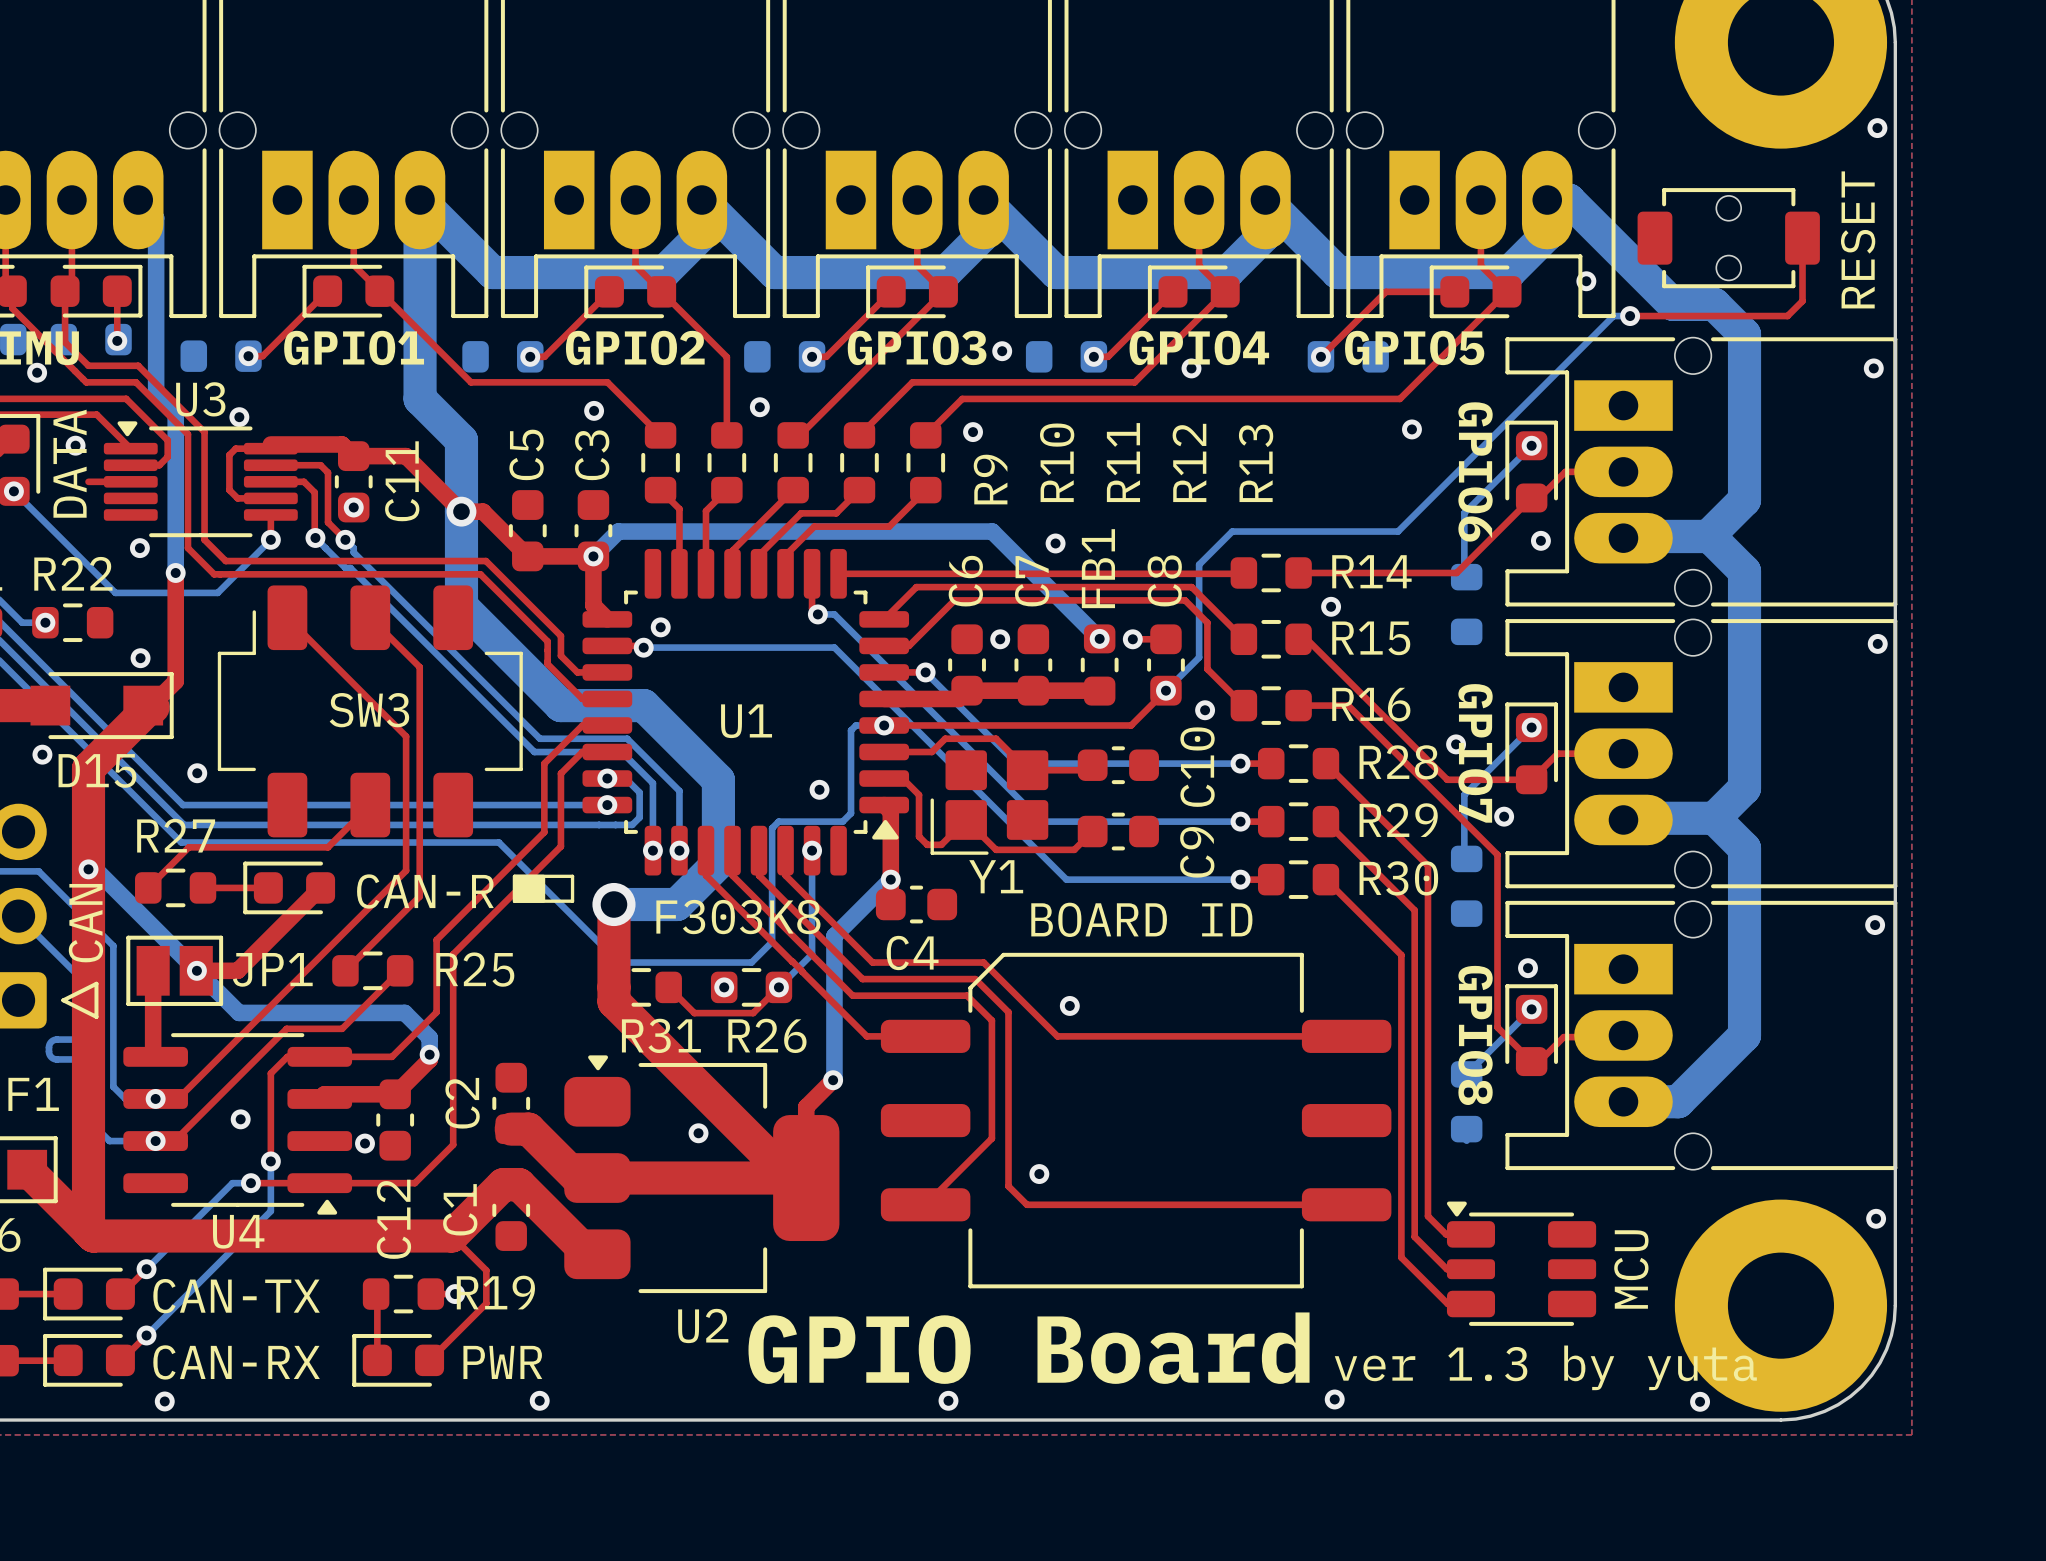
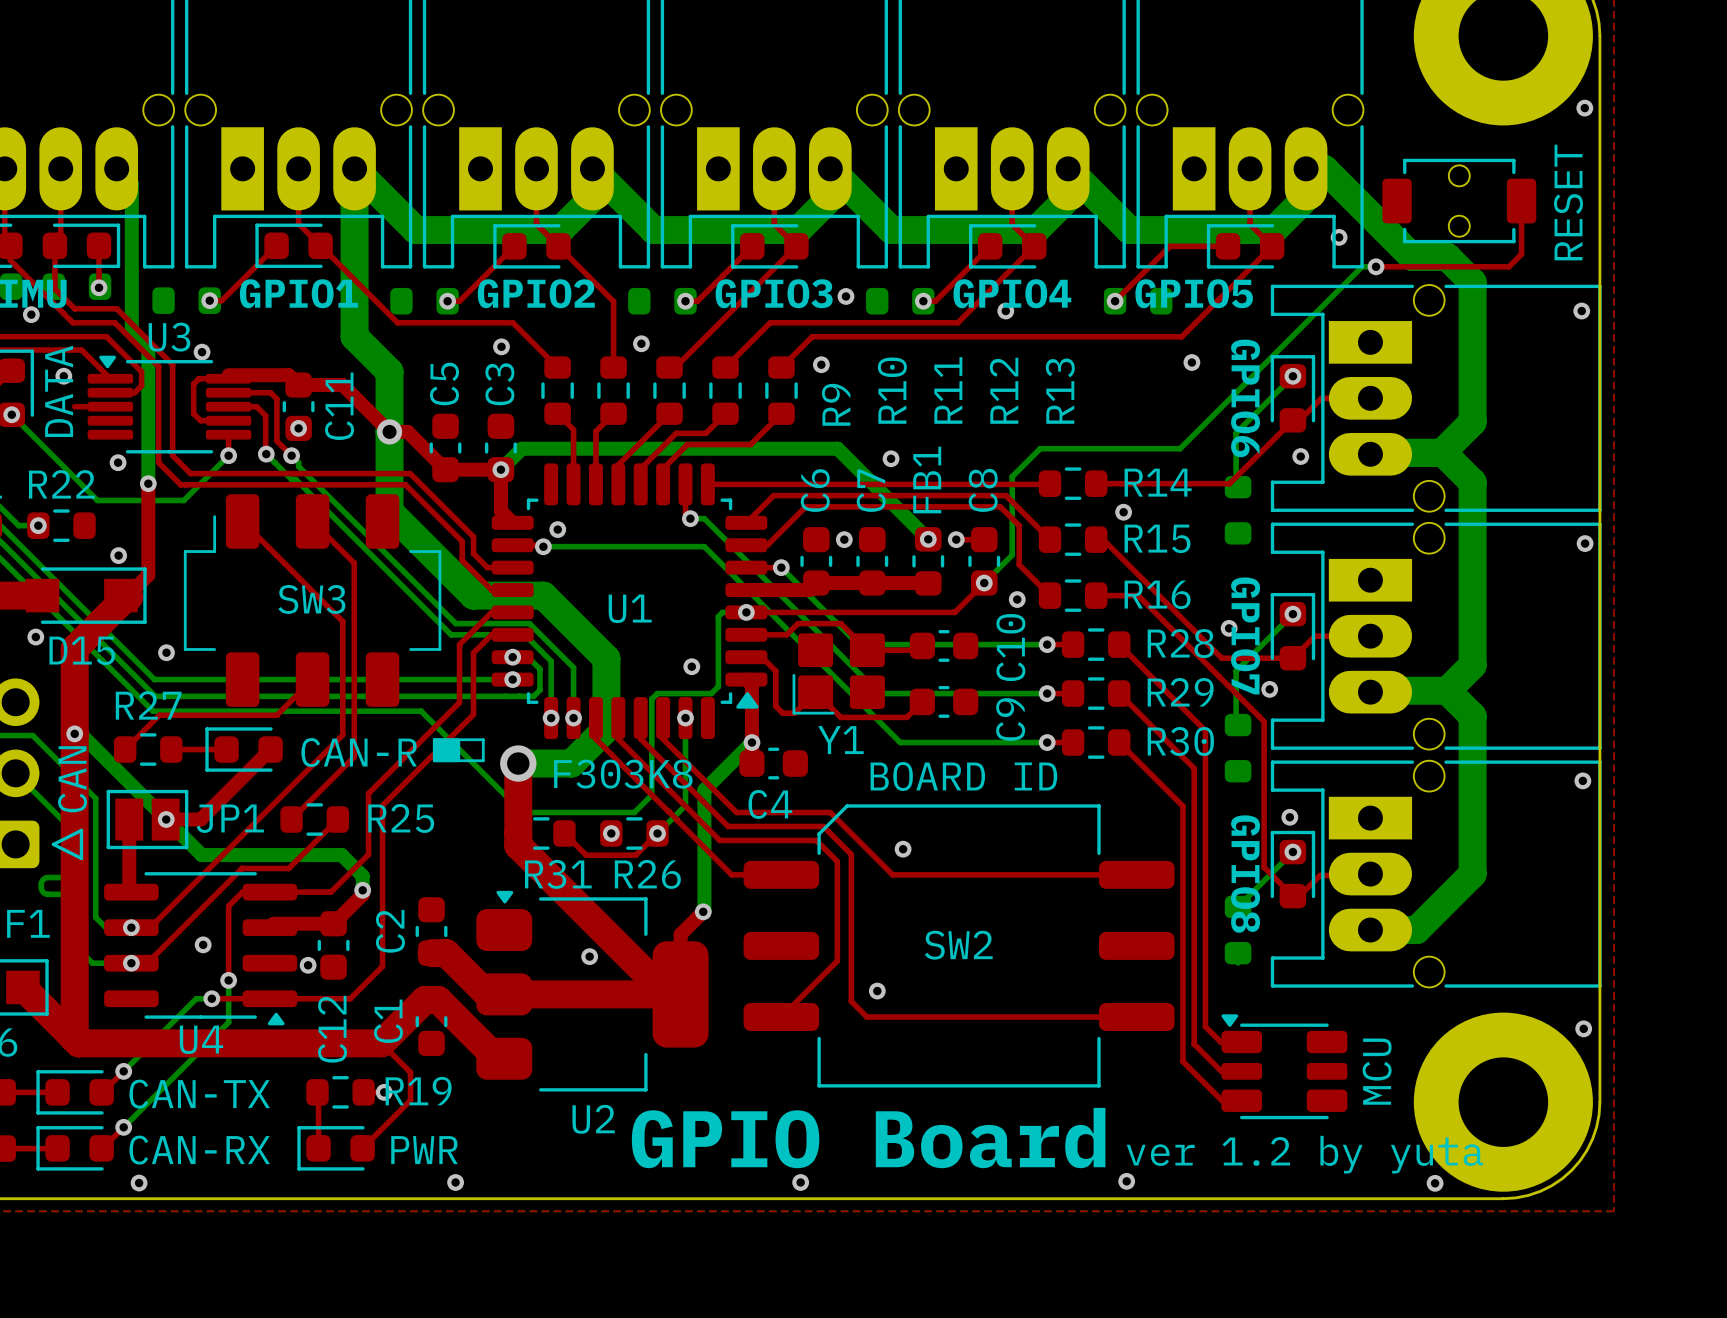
Y1 footprint: [930, 750, 1049, 855] -> [792, 633, 885, 715]
SW2 name: none -> SW2 (958, 945)
drawing shape: [748, 1312, 1757, 1391] -> [631, 1107, 1484, 1174]

